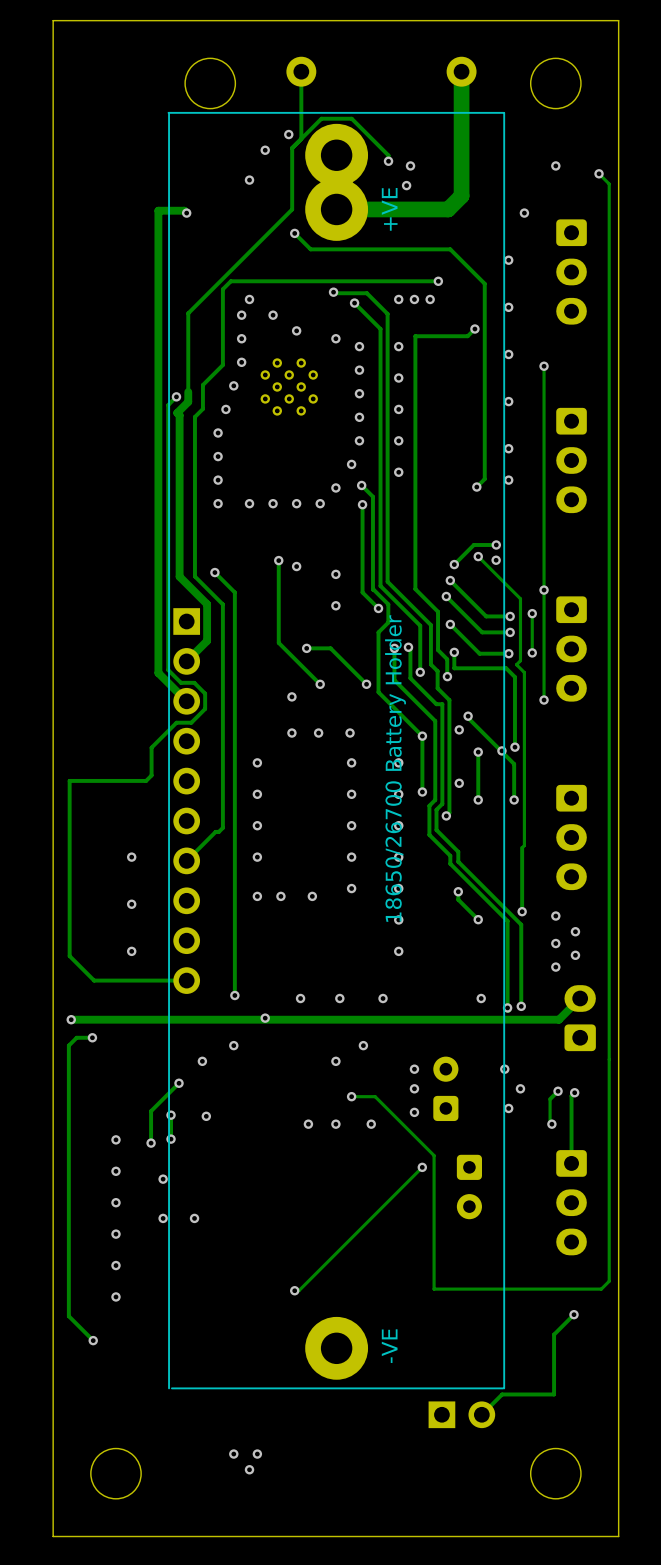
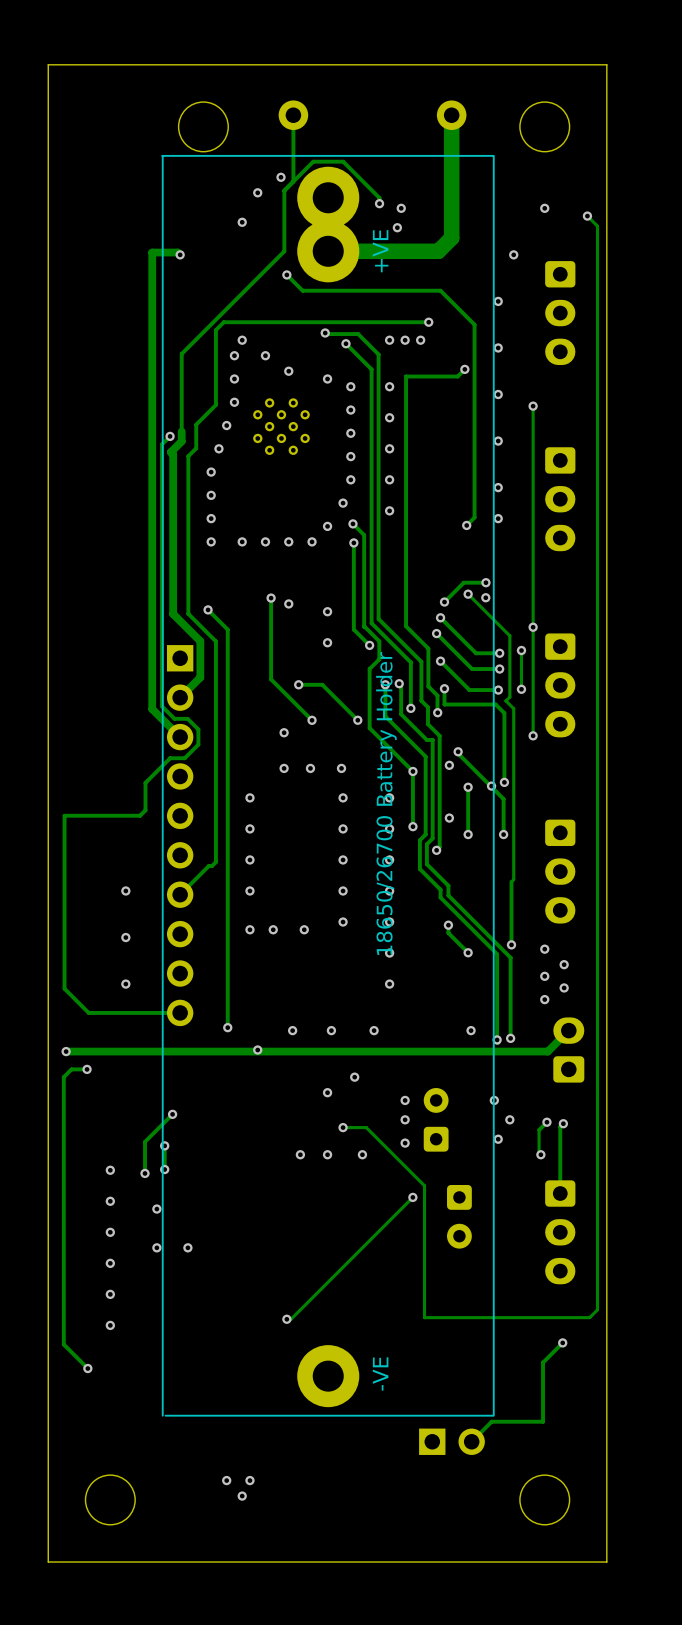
via: (233, 1045) -> none
via: (202, 1061) -> none
via: (206, 1116) -> none

